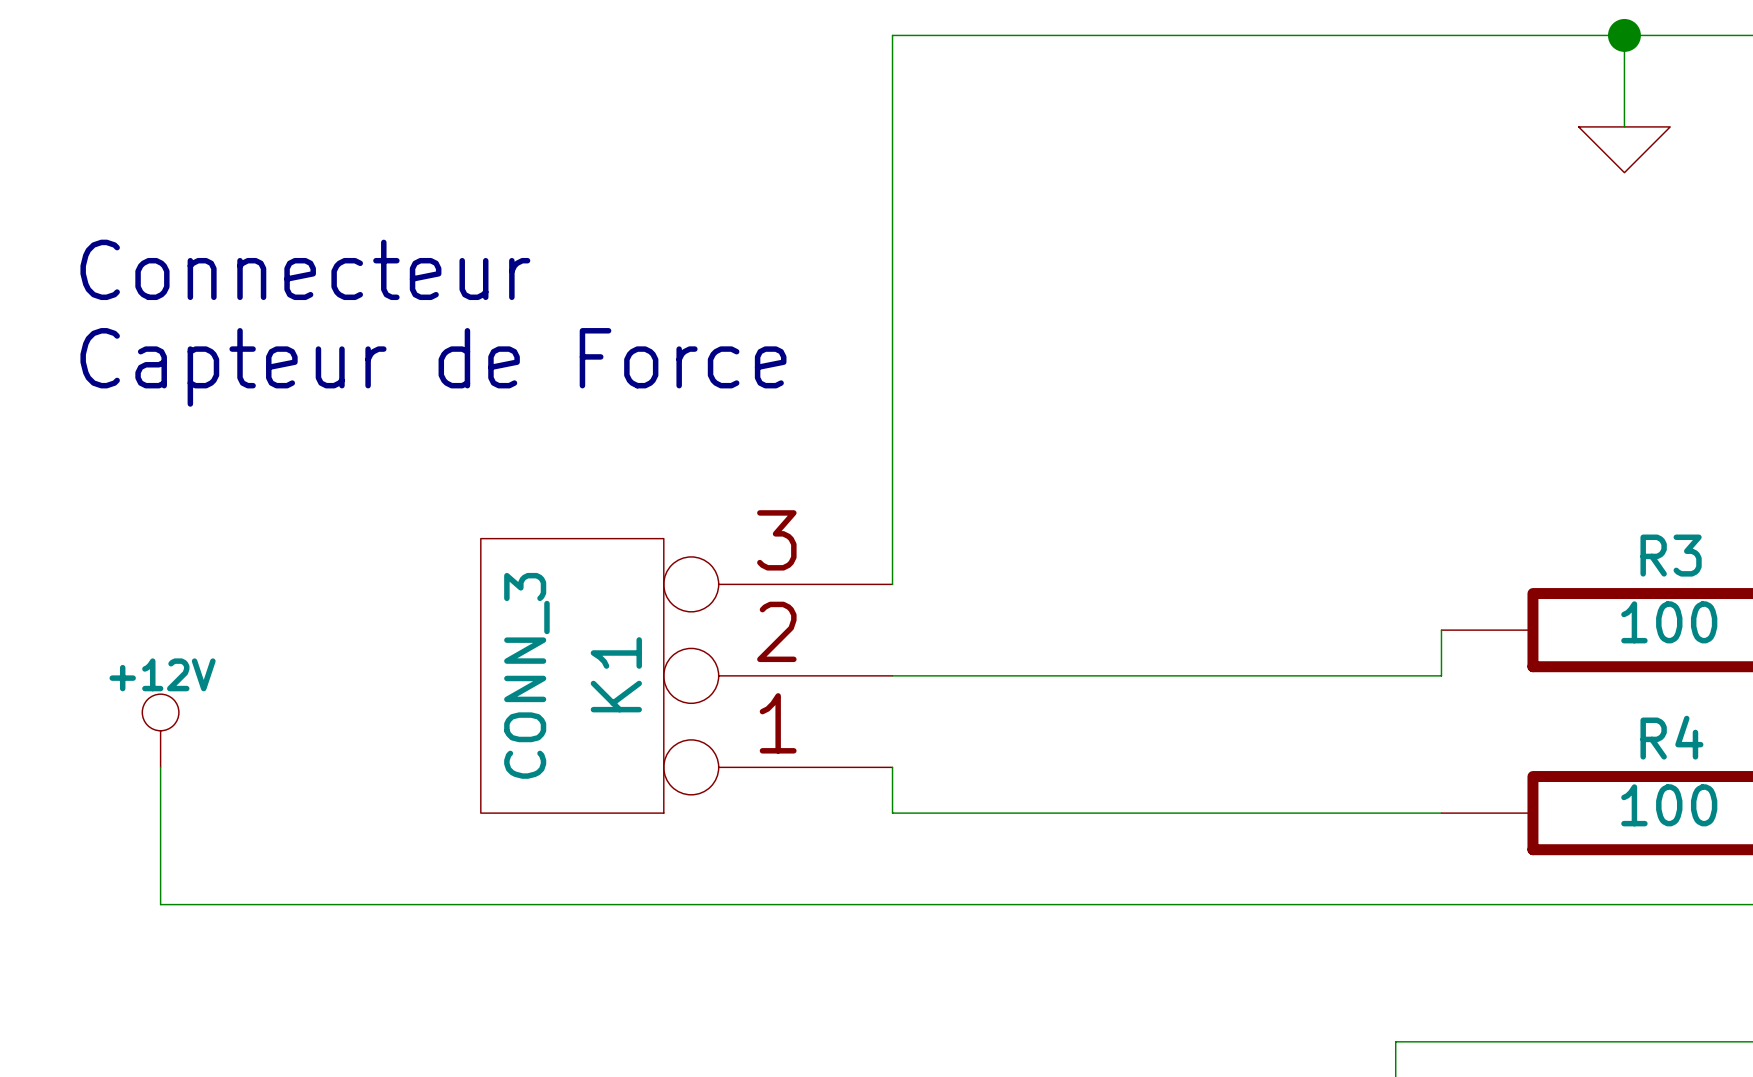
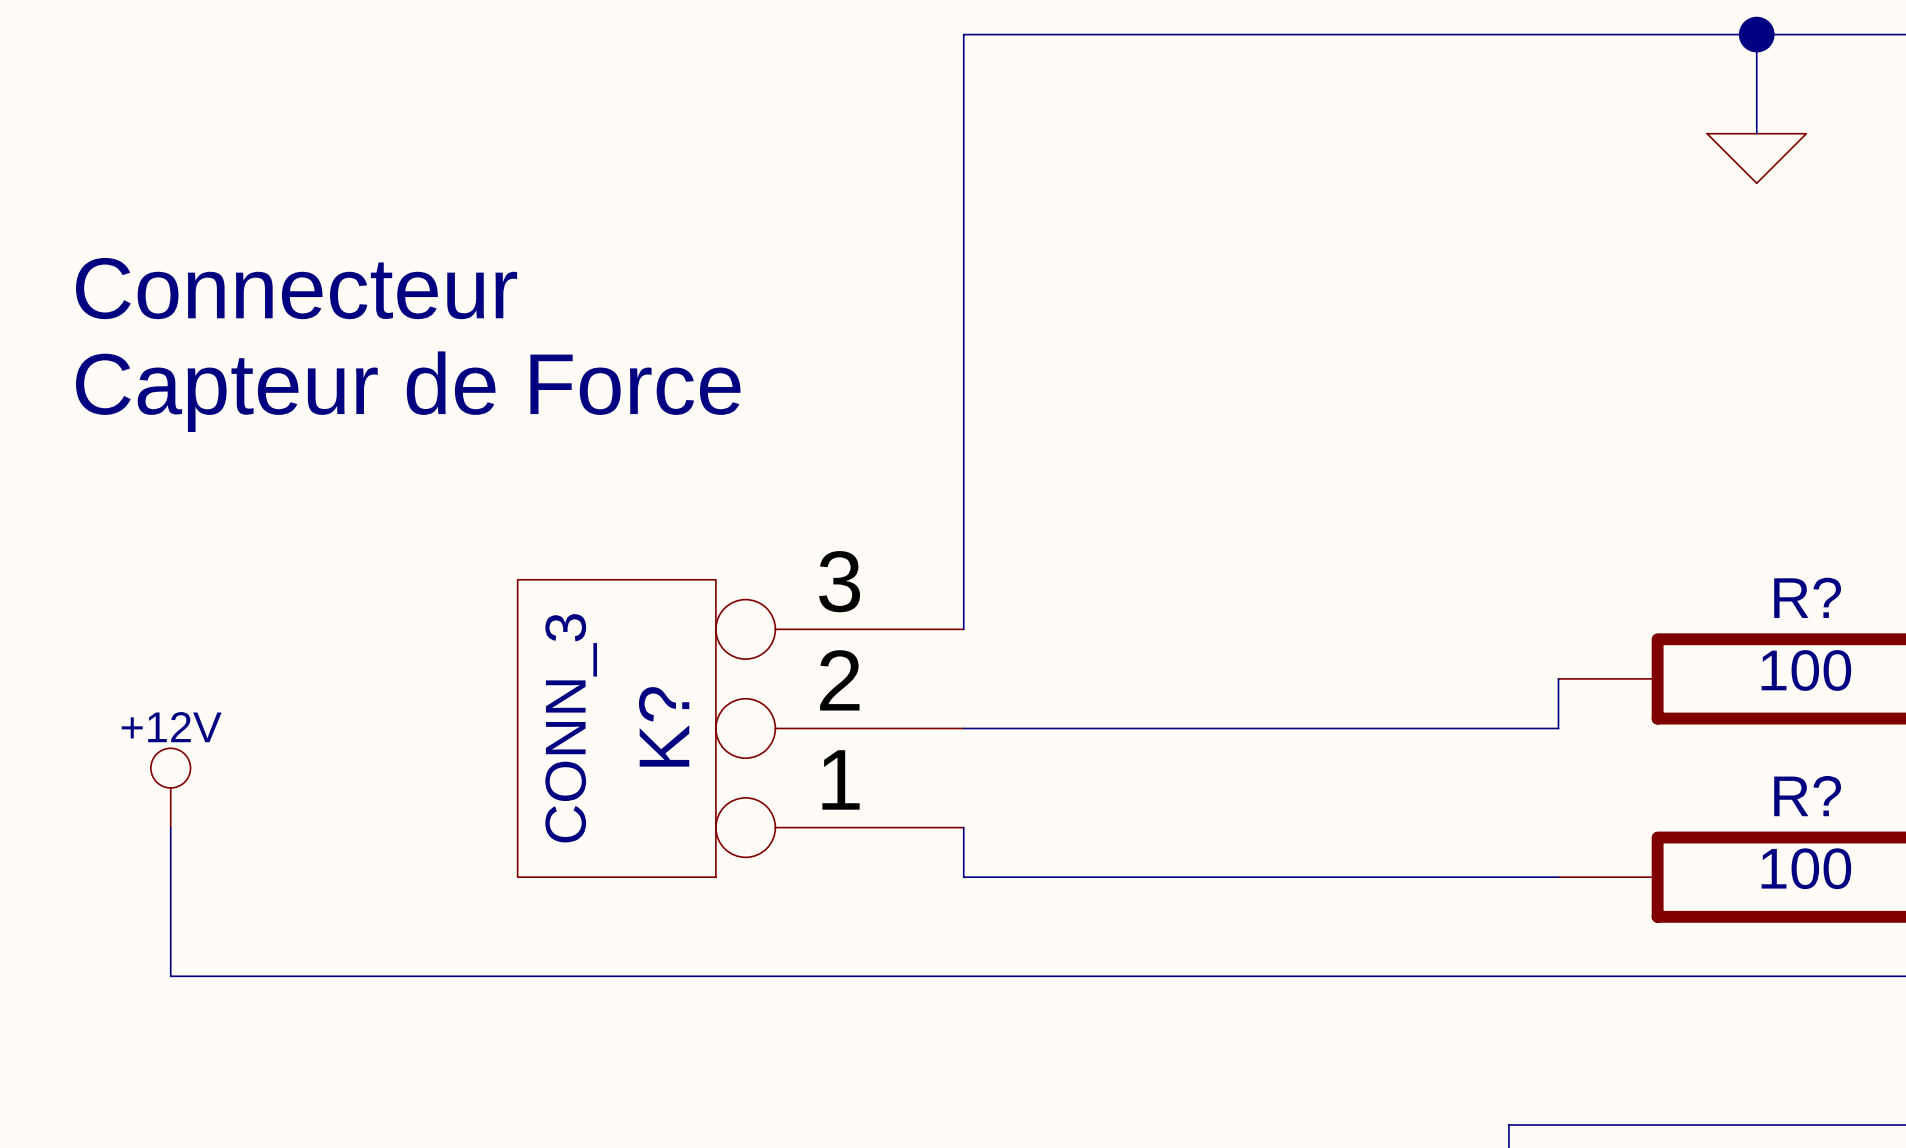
R3 name: R3 (1671, 555) -> R? (1807, 597)
K1 name: K1 (616, 674) -> K? (664, 726)
R4 name: R4 (1671, 737) -> R? (1807, 796)

